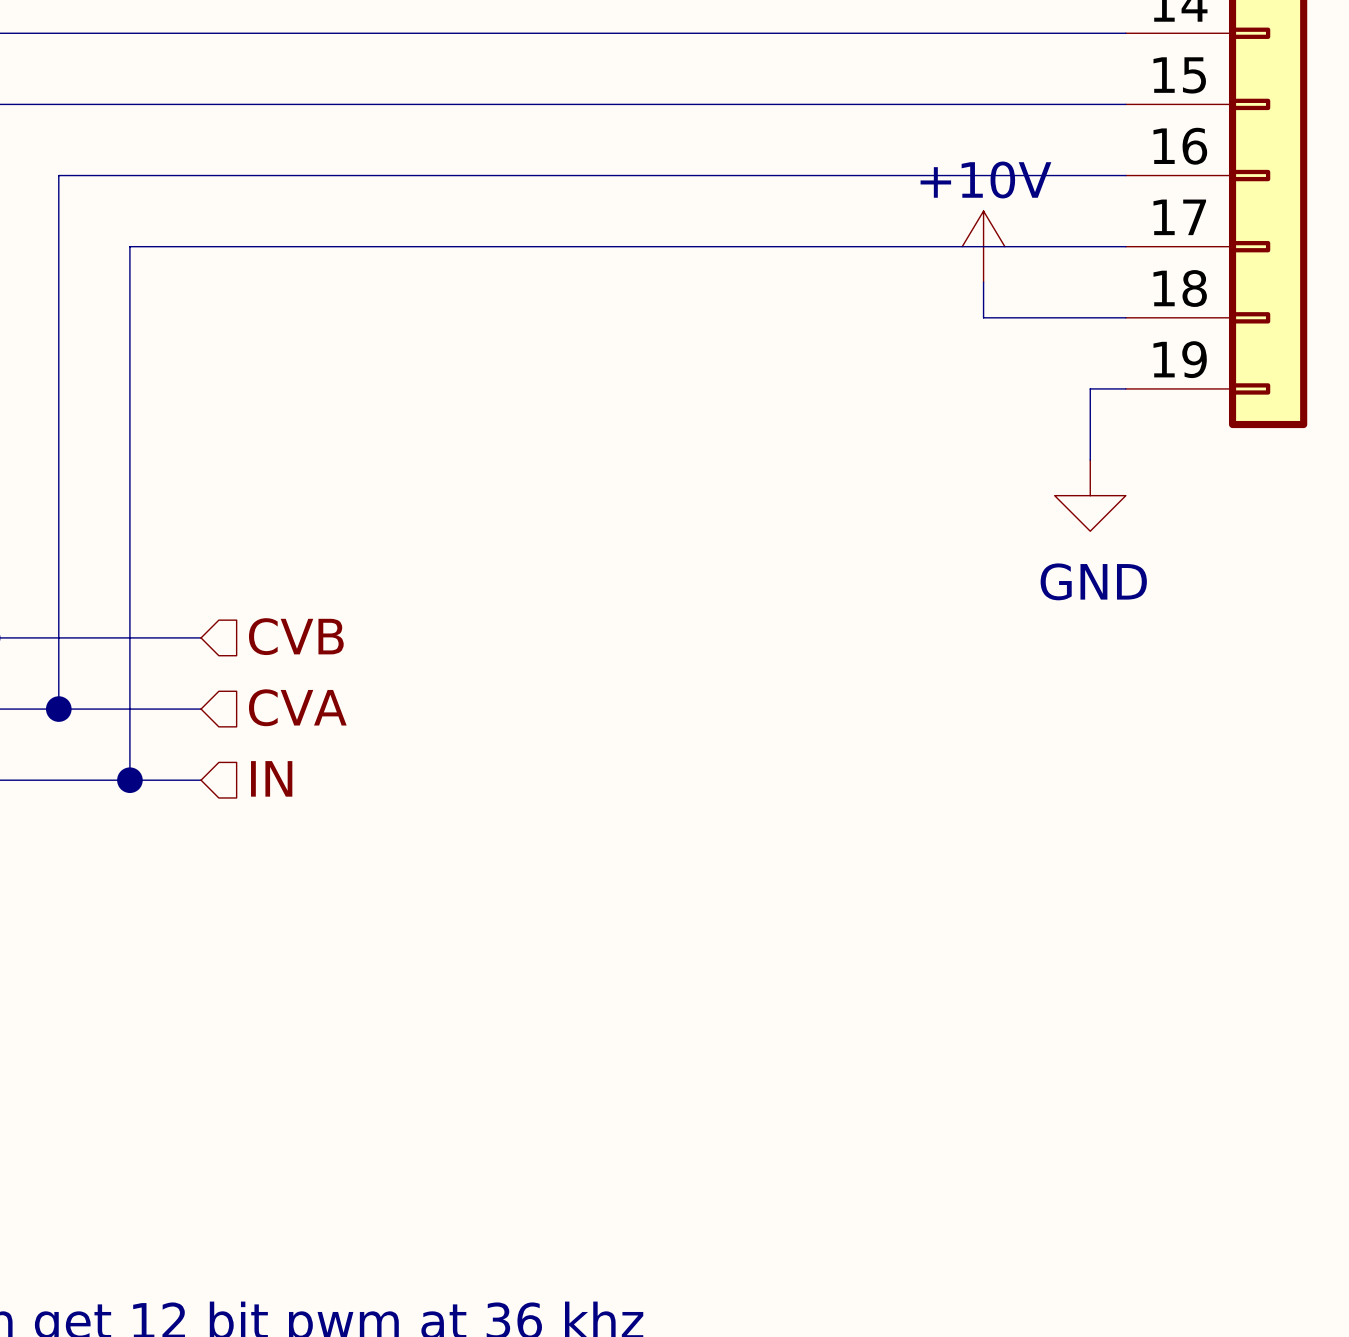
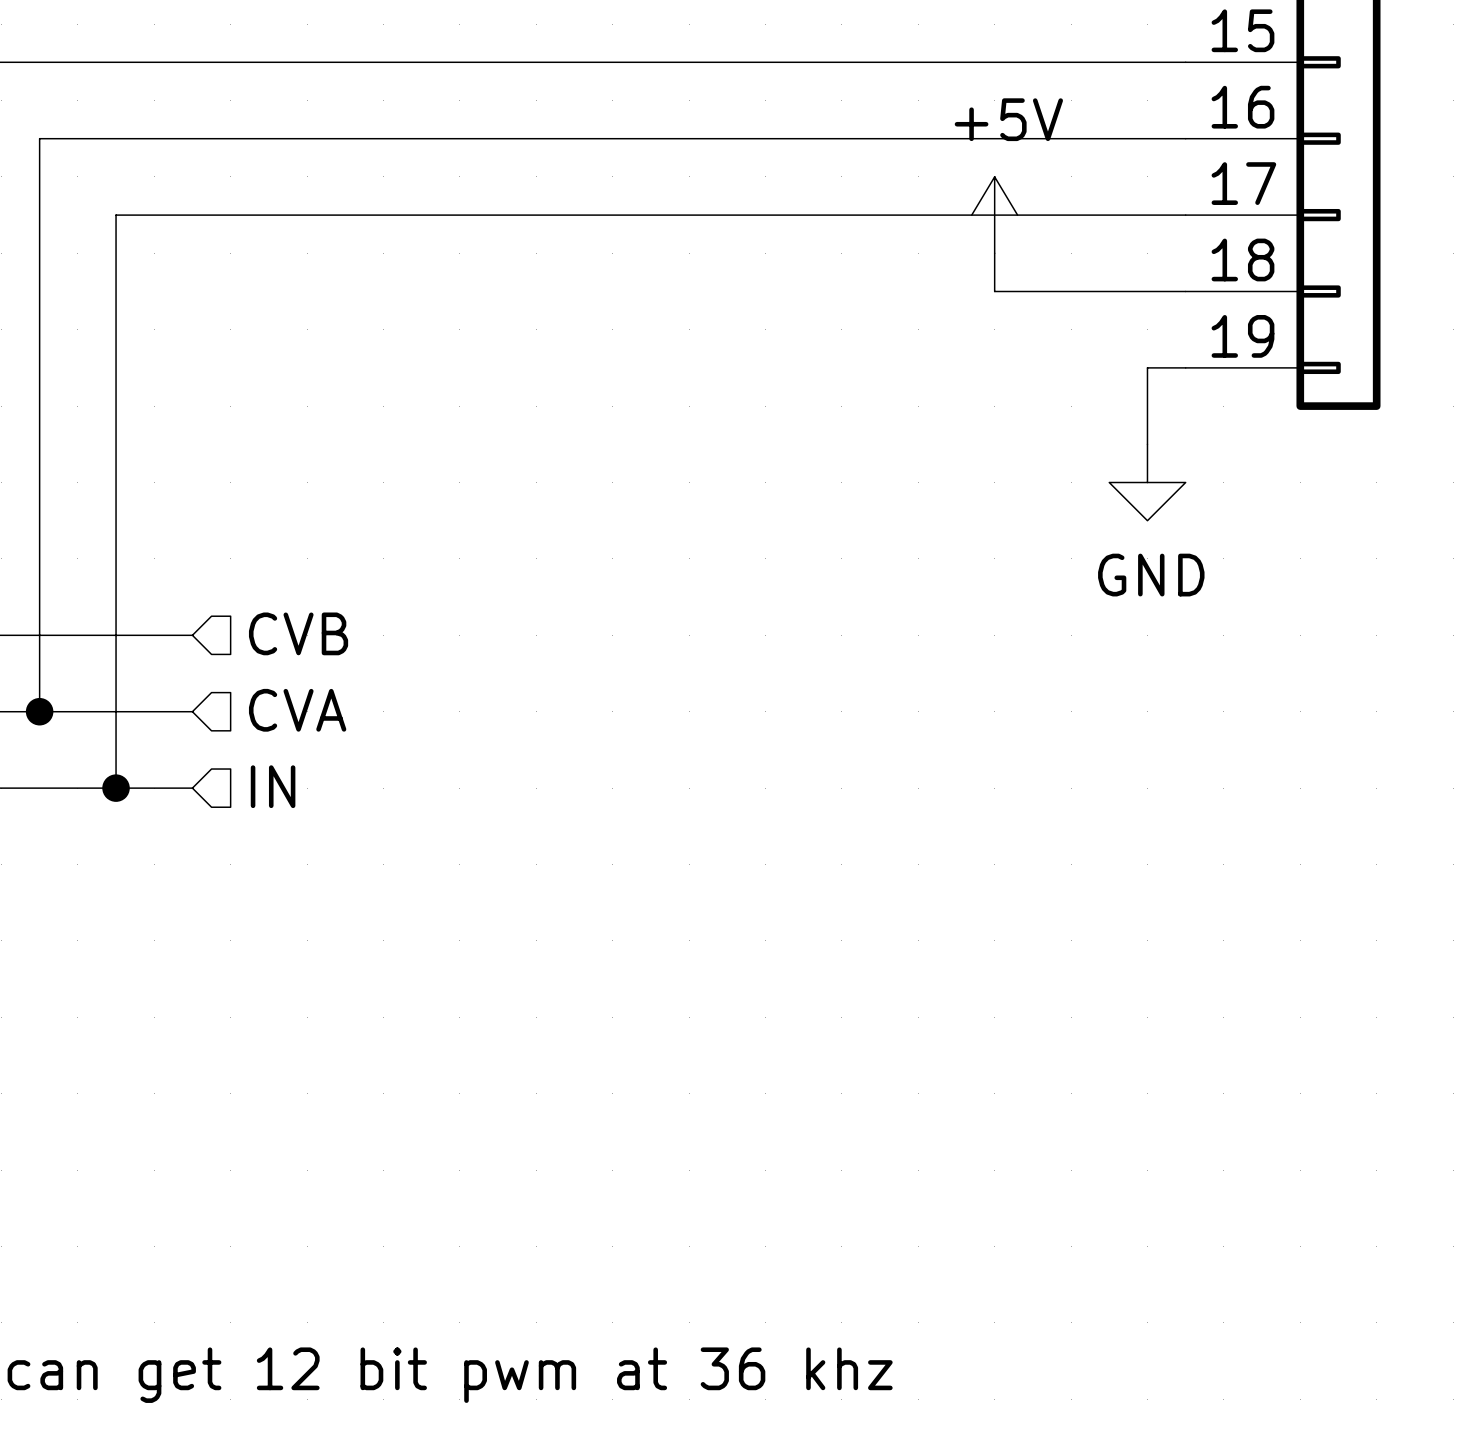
power symbol: none -> +5V (994, 215)
power symbol: +10V (983, 246) -> none
wire: (983, 282) (983, 317) -> (994, 253) (994, 291) (1032, 291)

